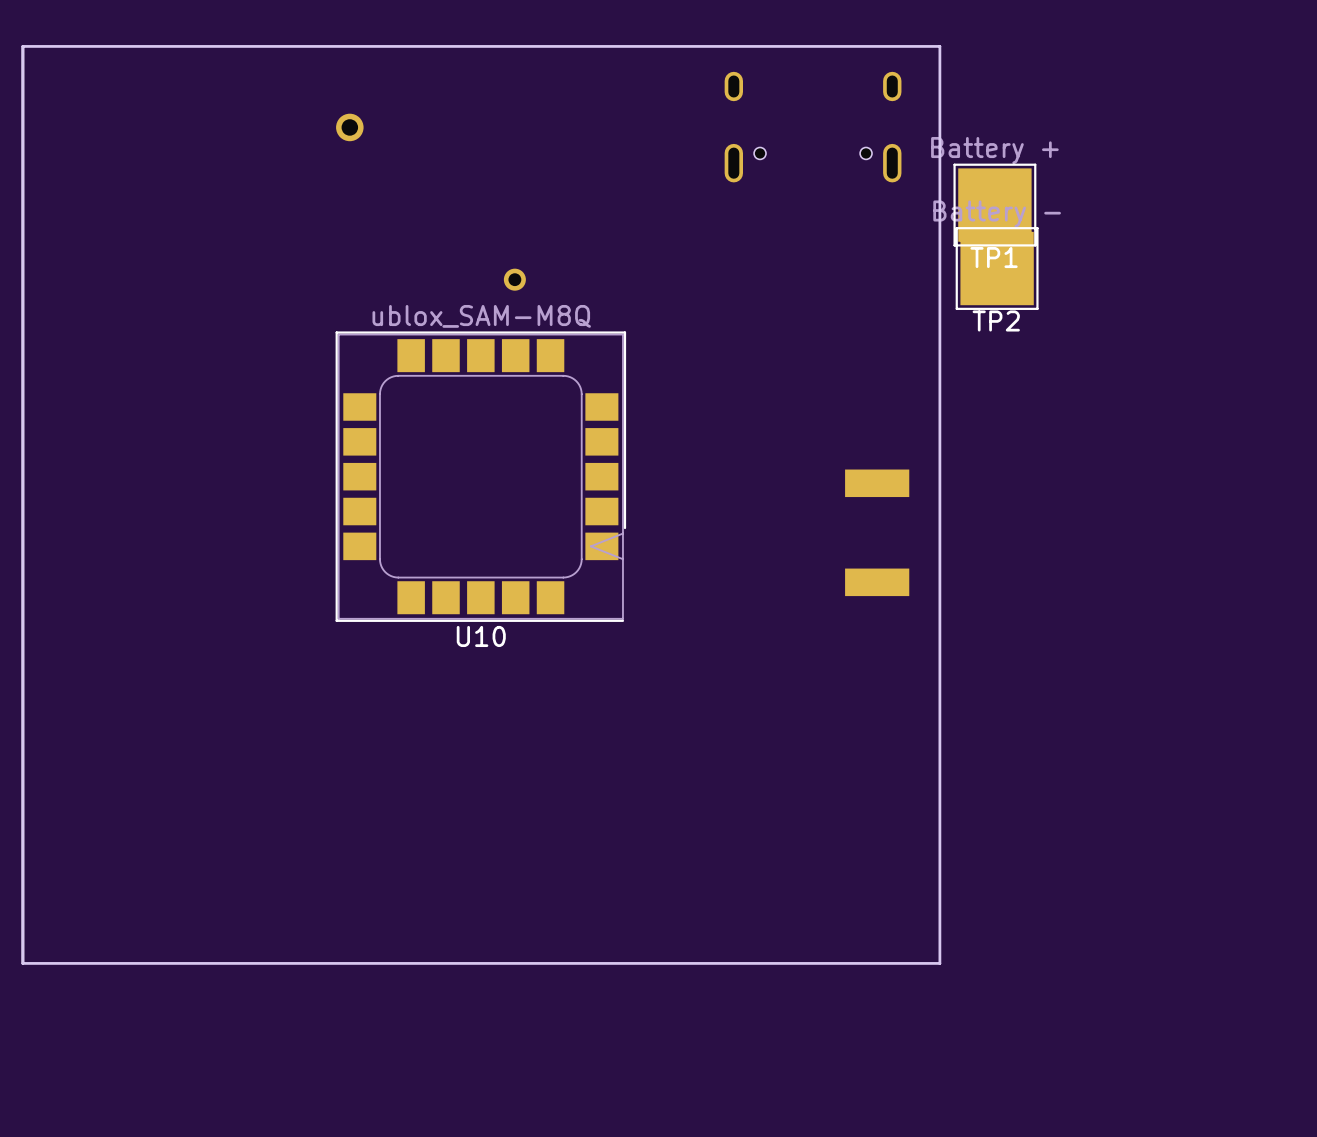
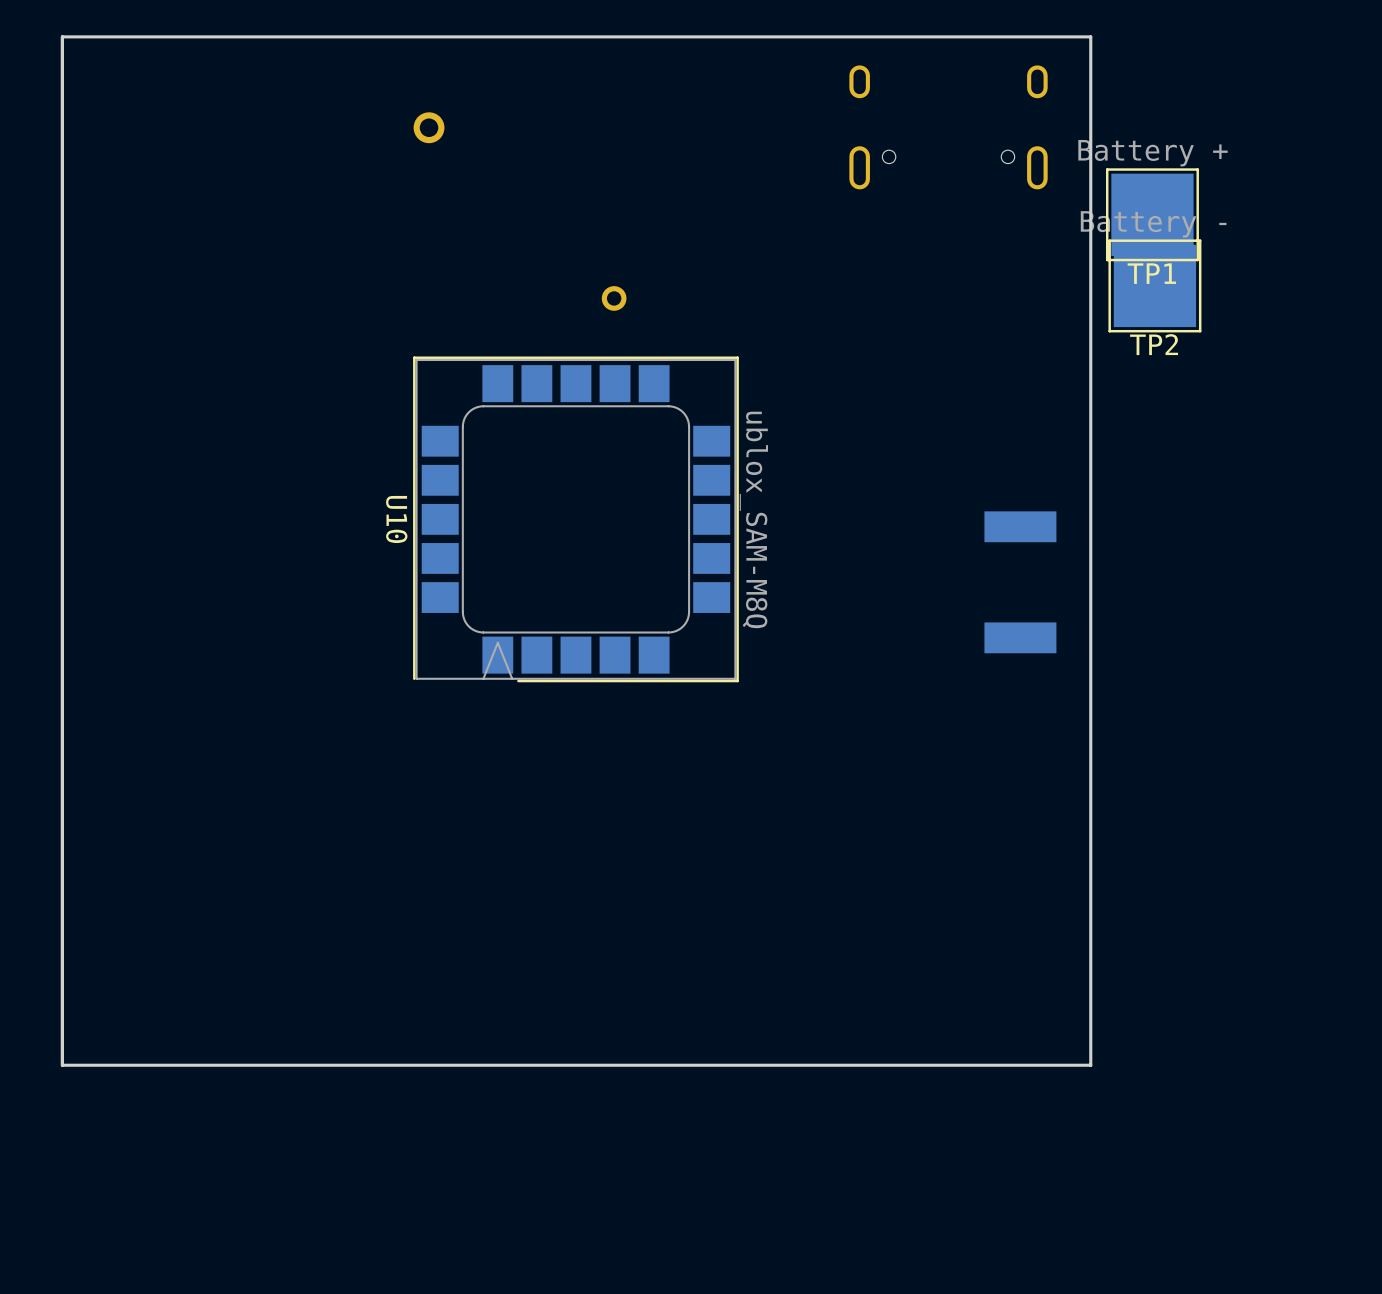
U10 rotation: 0° (480, 476) -> 90° clockwise (575, 519)

